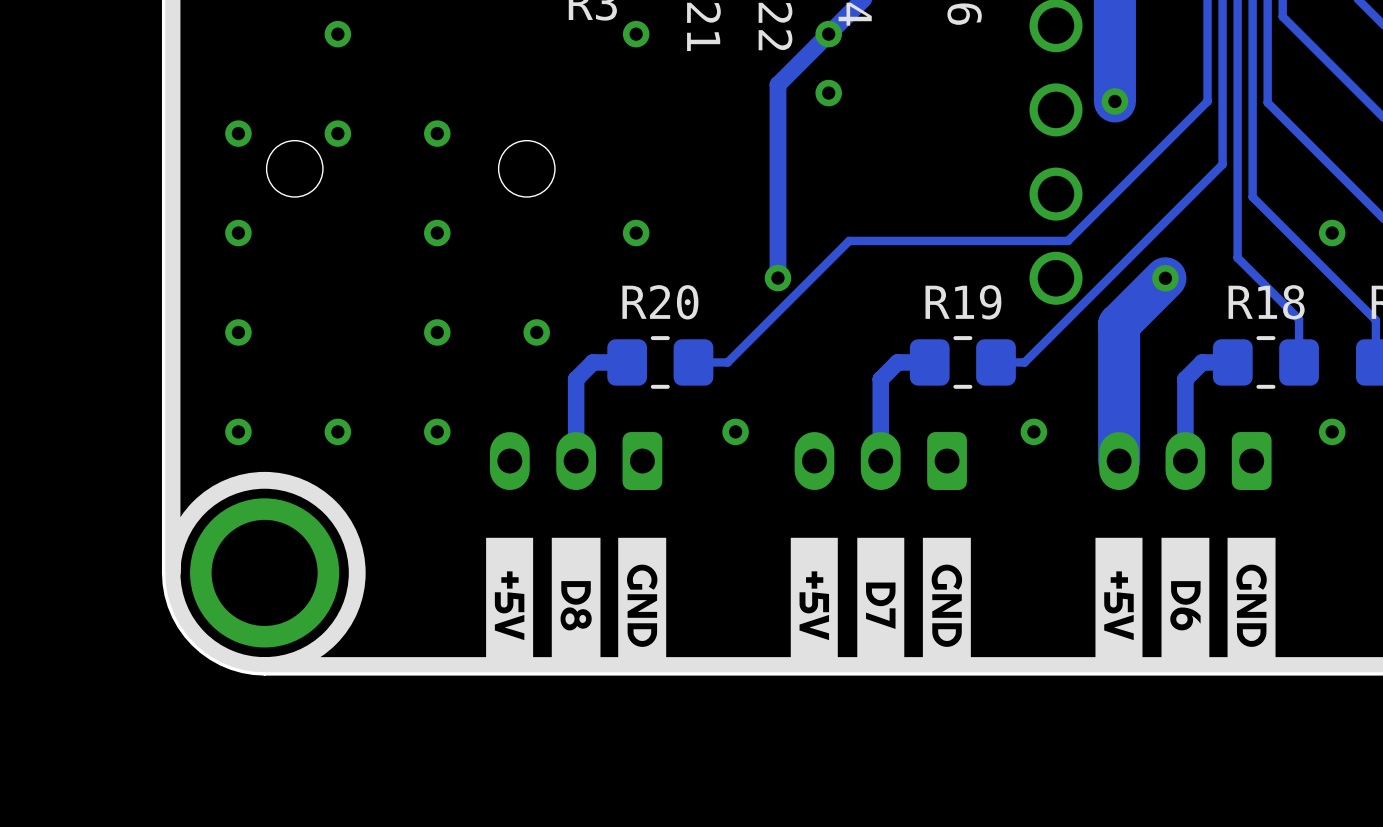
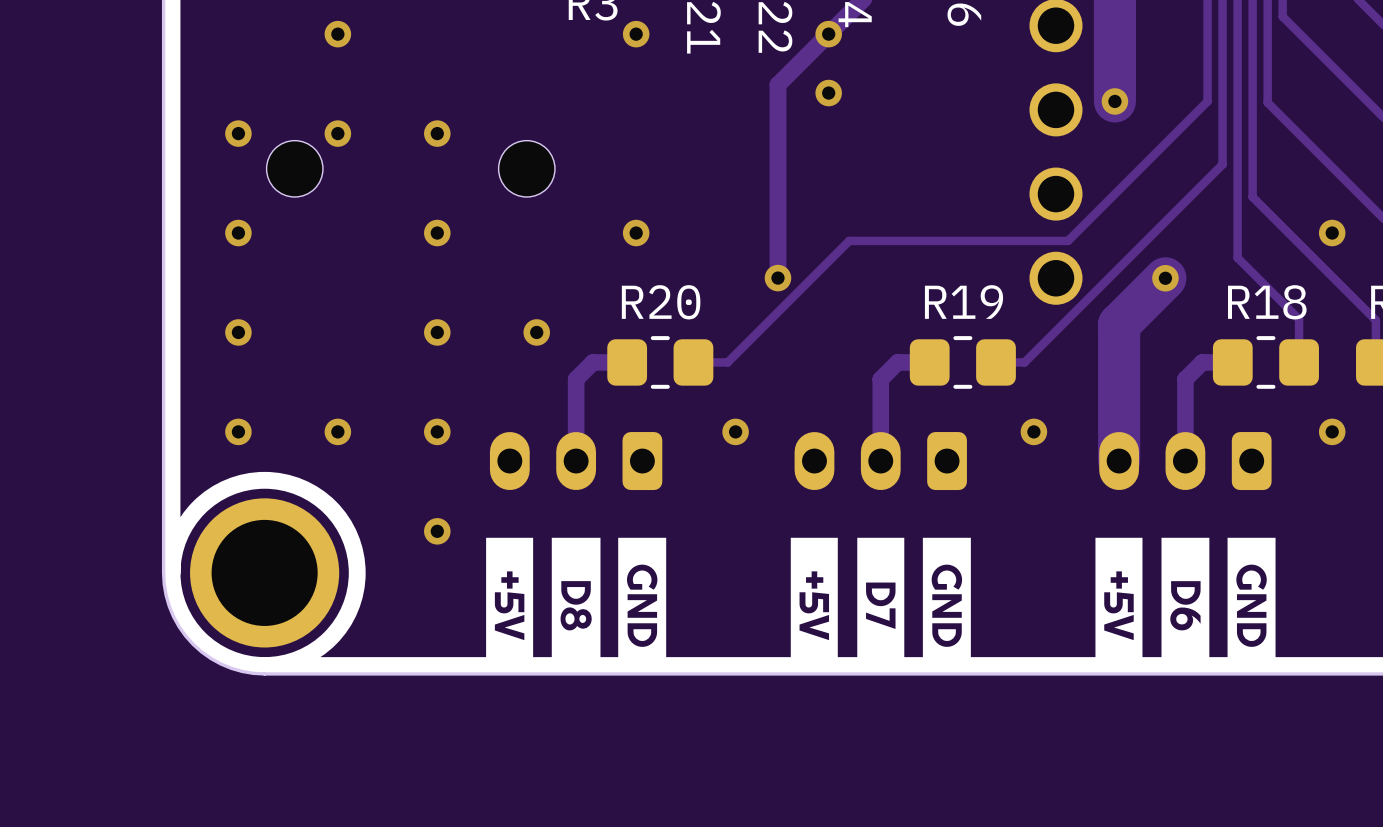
via: none -> (437, 531)

